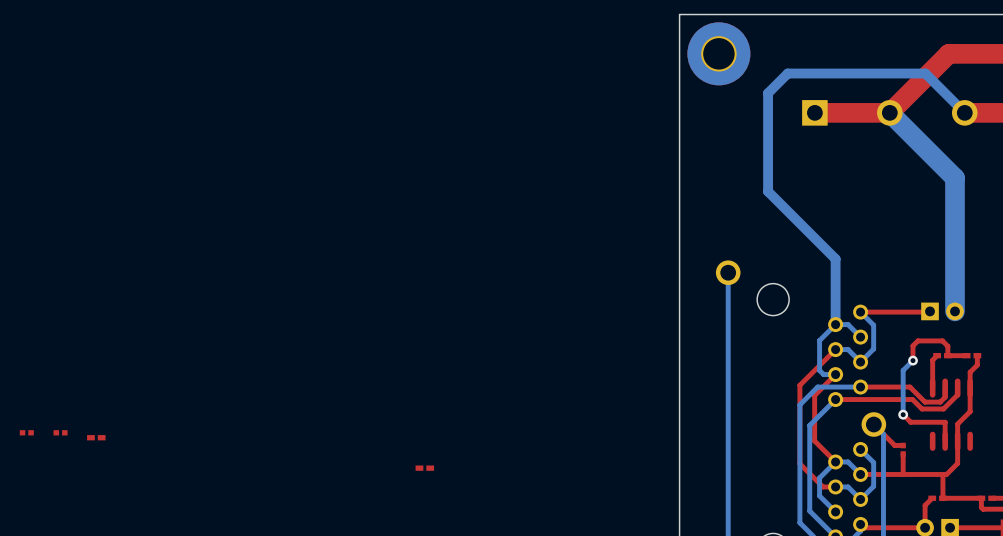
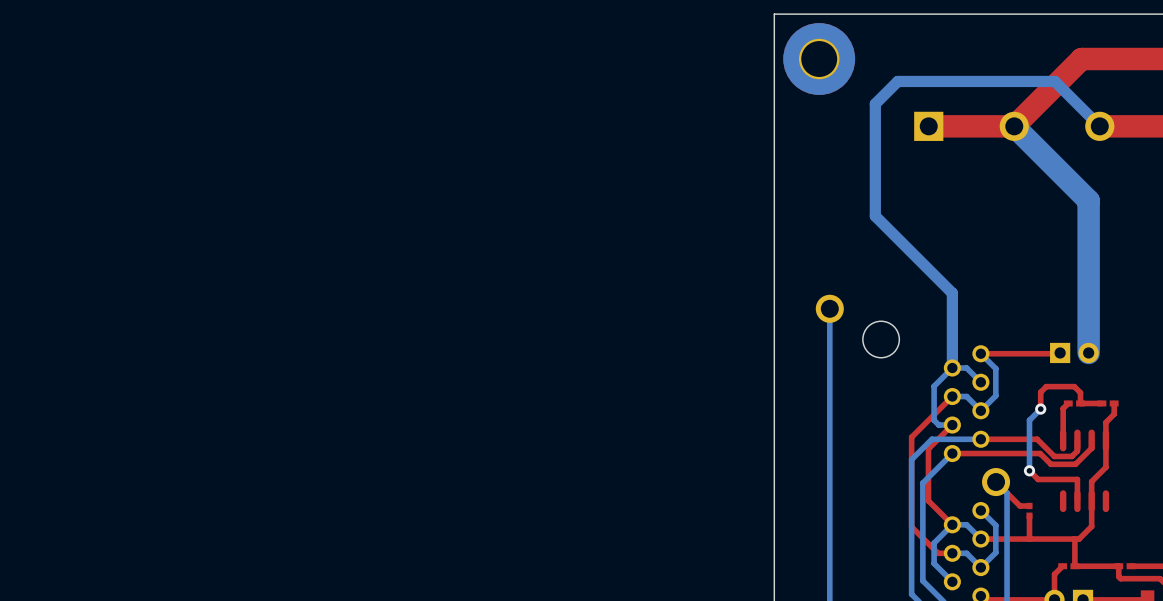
part: (26, 432) -> none
part: (60, 432) -> none
part: (96, 437) -> none
part: (424, 468) -> none

